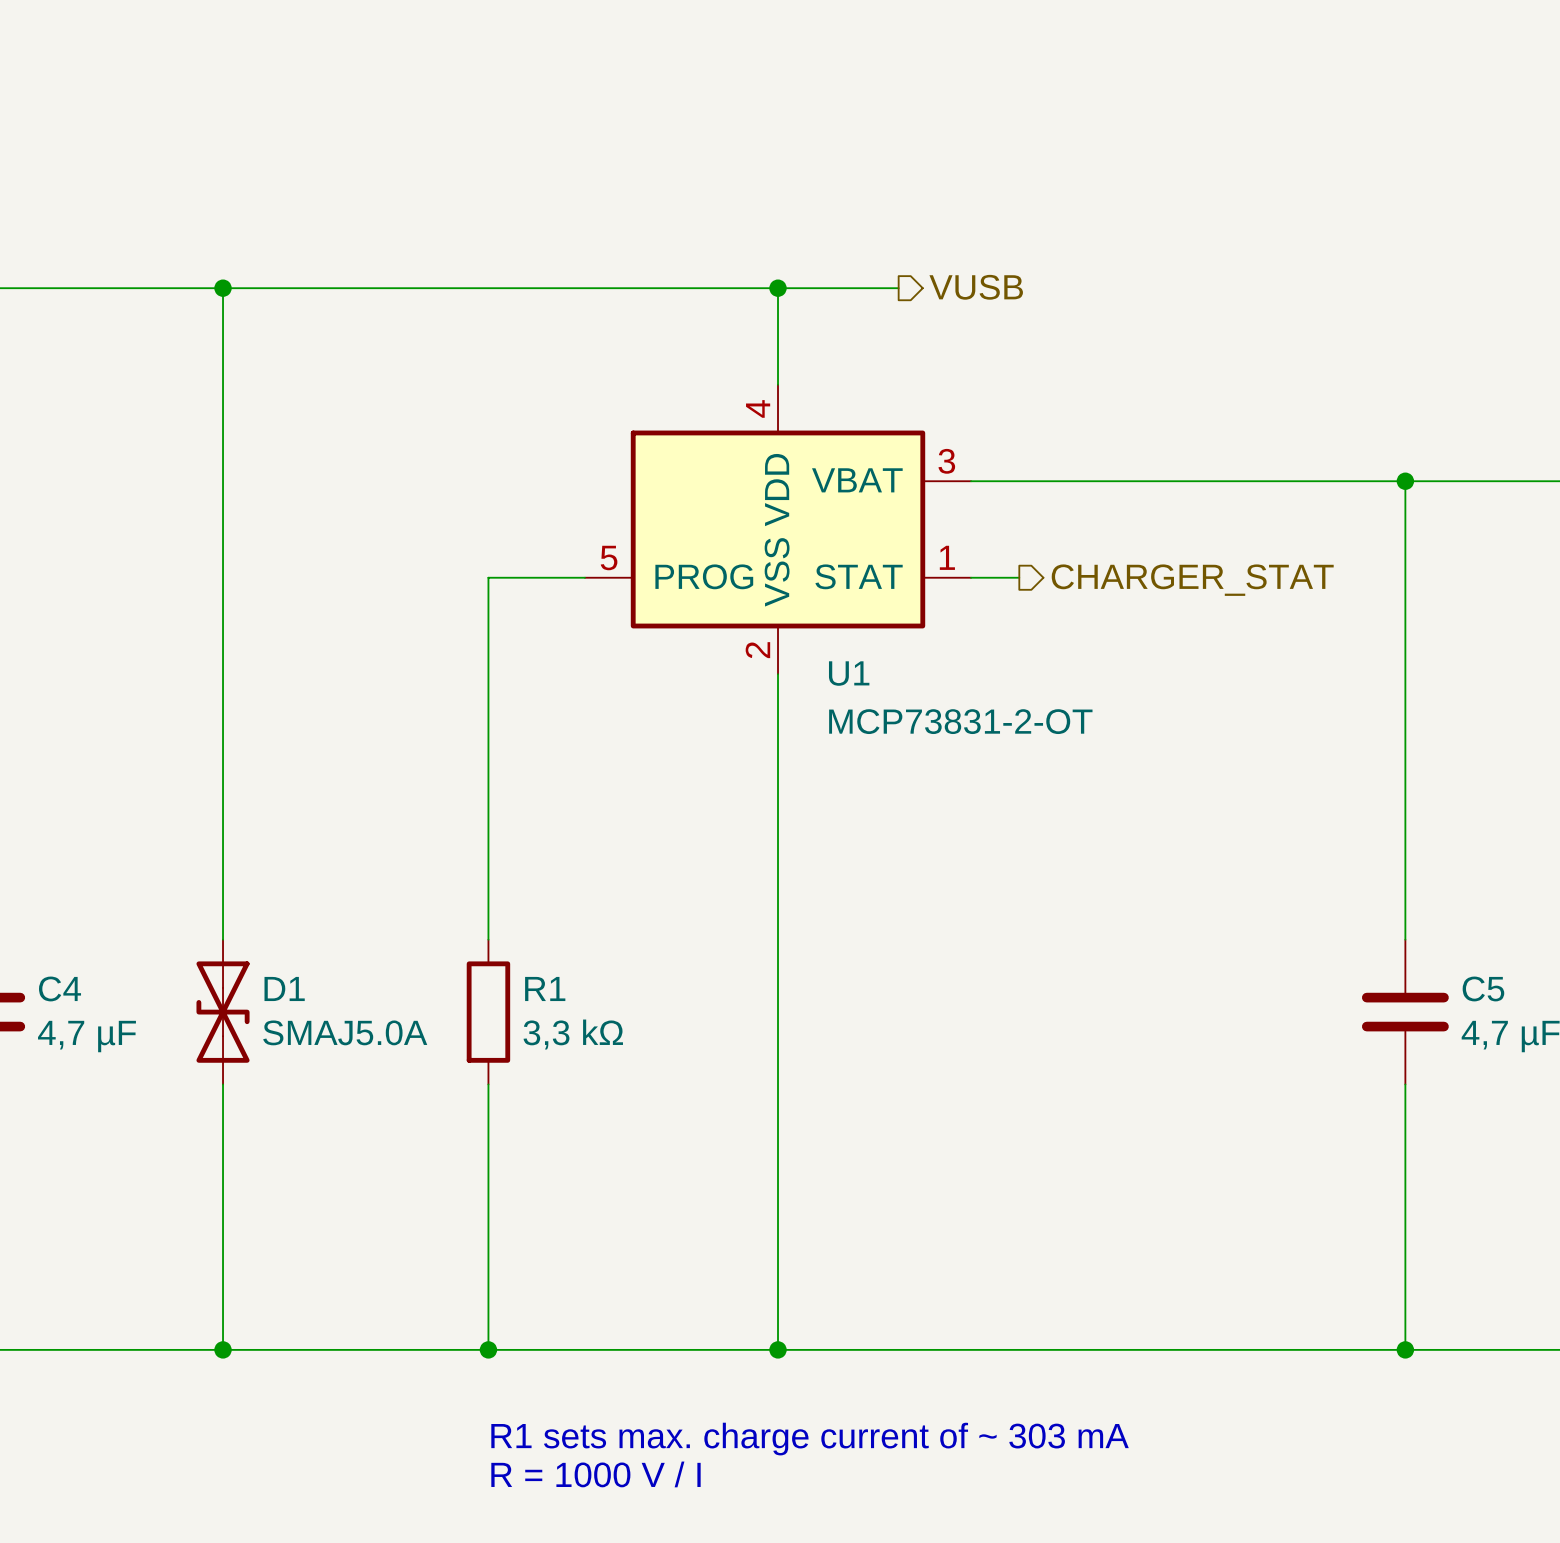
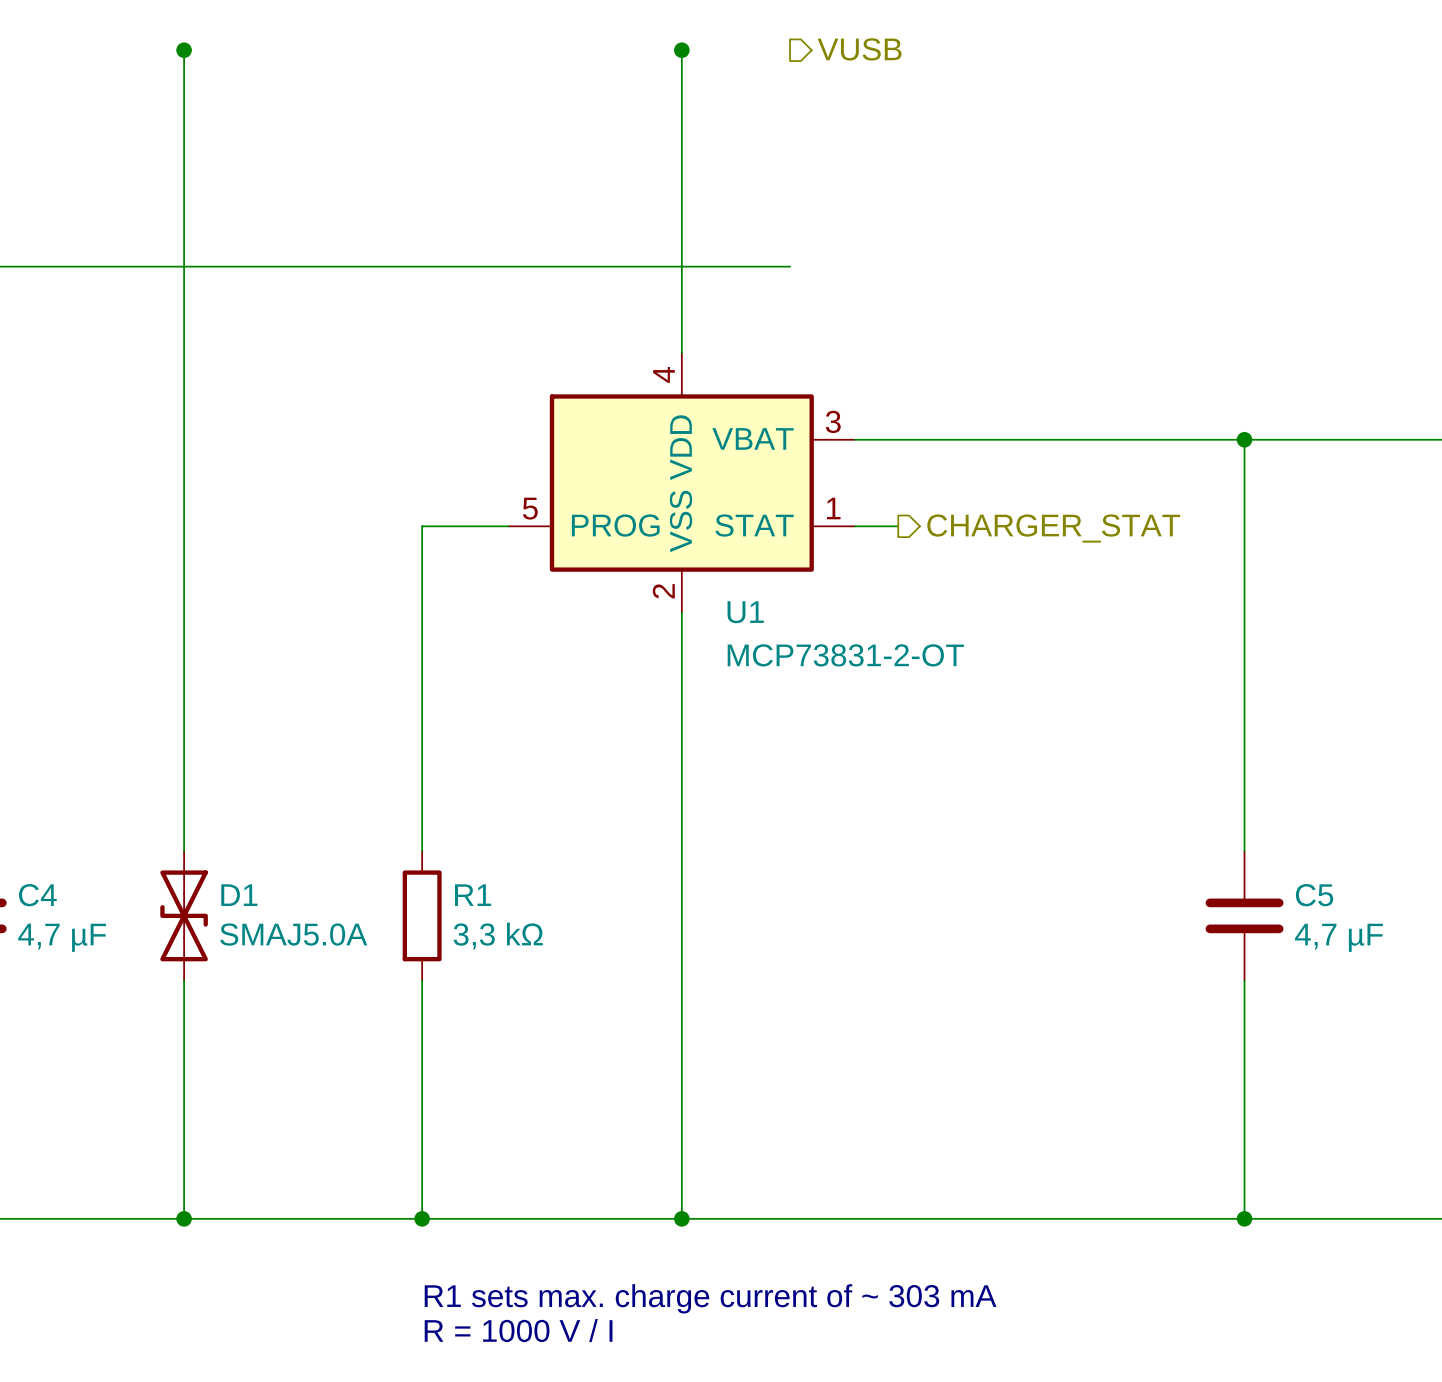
wire: none -> (184, 50) (184, 266)
junction: none -> (184, 50)
wire: none -> (681, 50) (681, 266)
junction: none -> (681, 50)
hierarchical label position: VUSB (976, 287) -> VUSB (859, 49)
junction: (223, 288) -> none
junction: (778, 288) -> none

